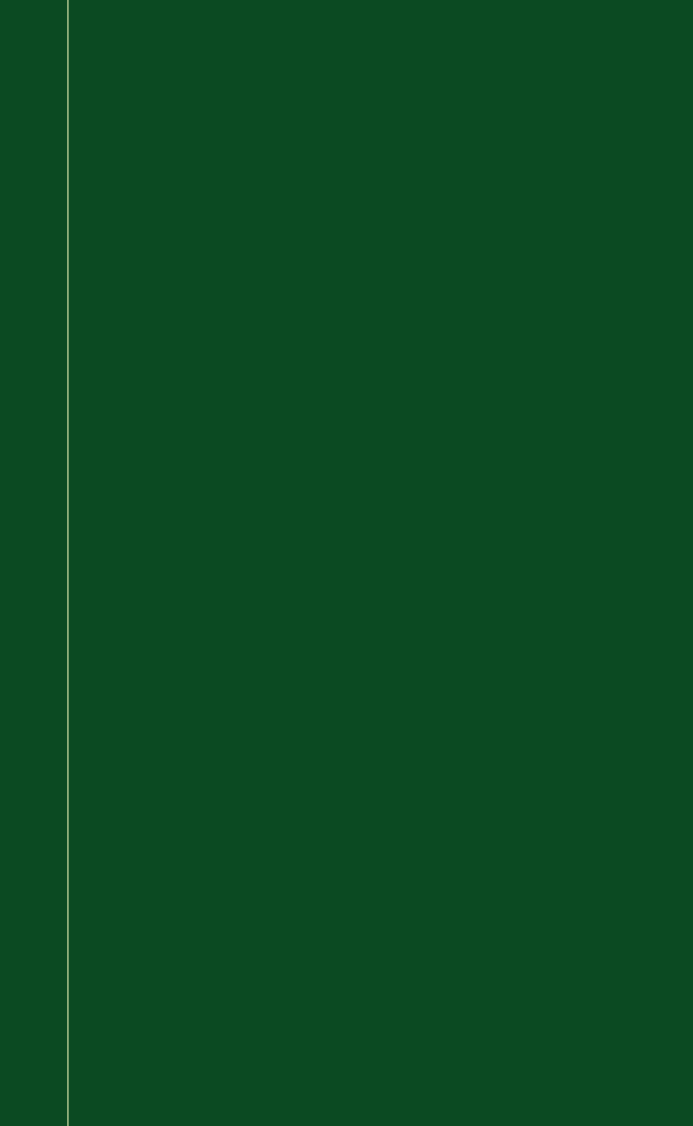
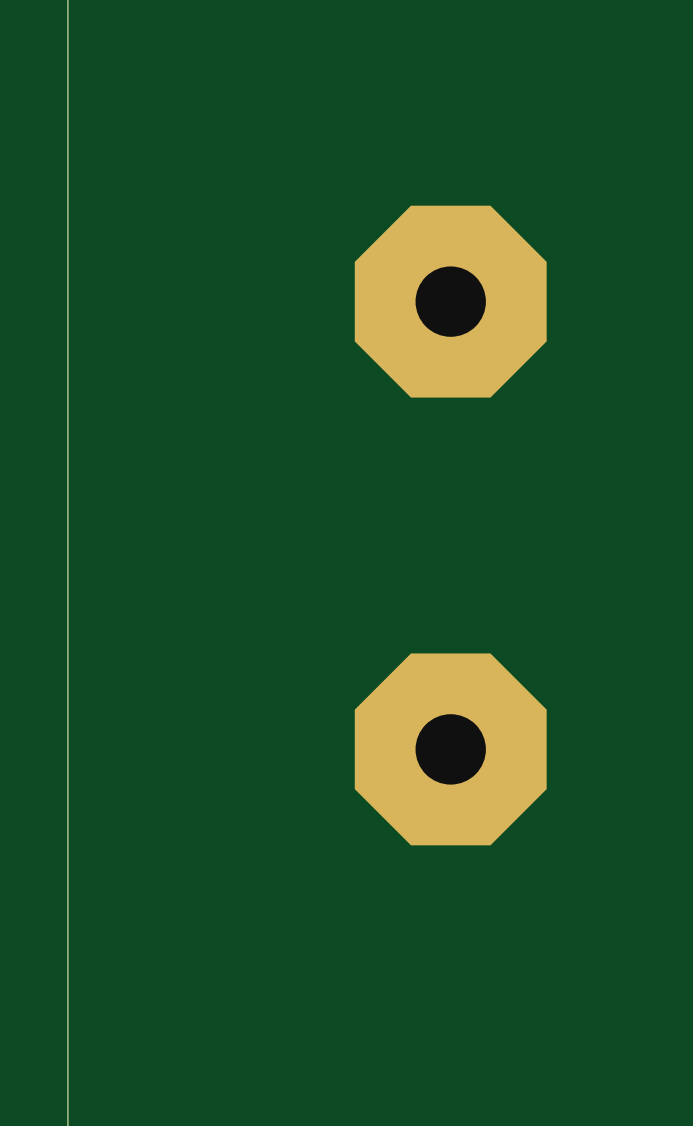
part: none -> (450, 301)
part: none -> (450, 749)

